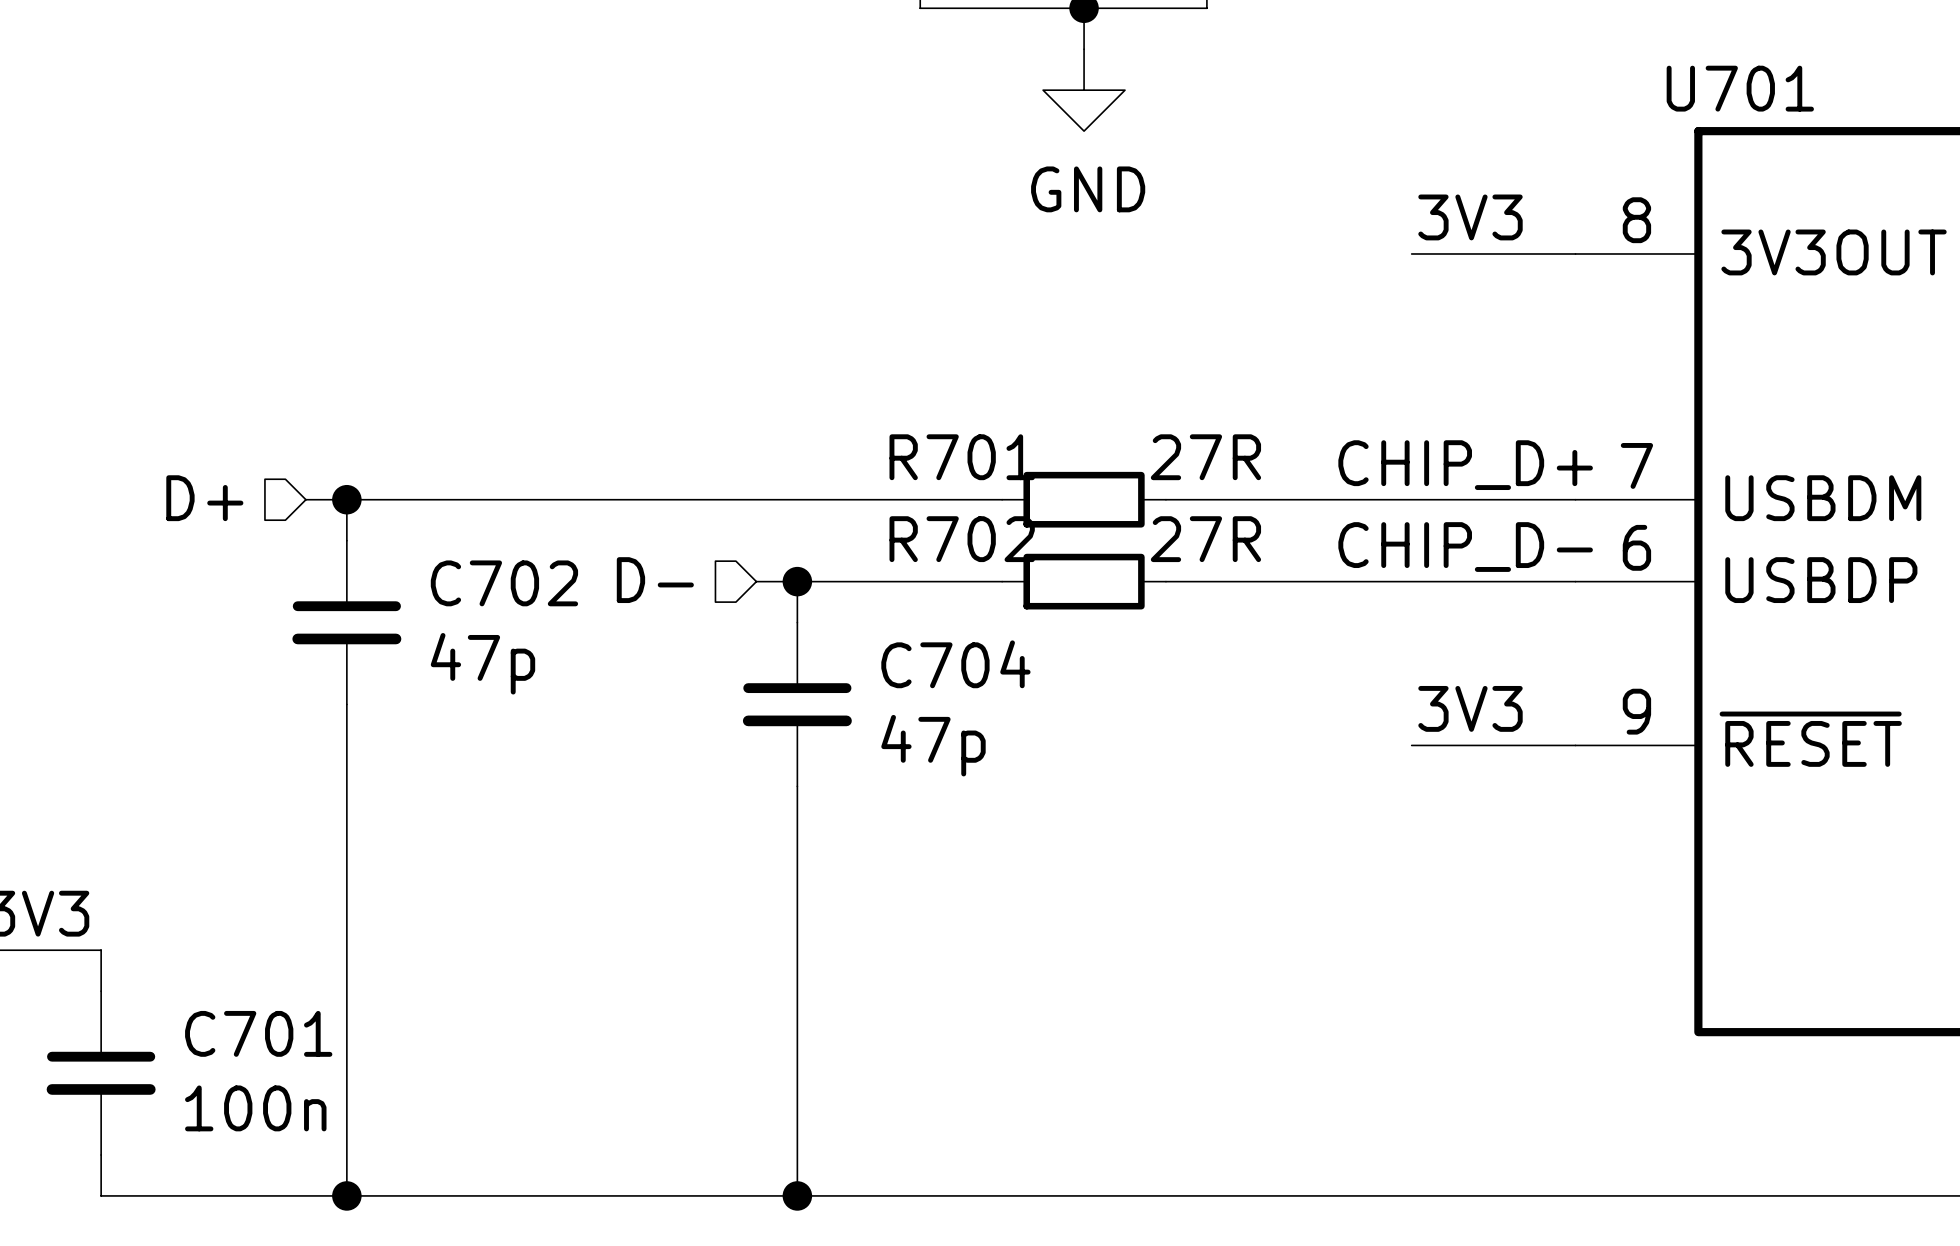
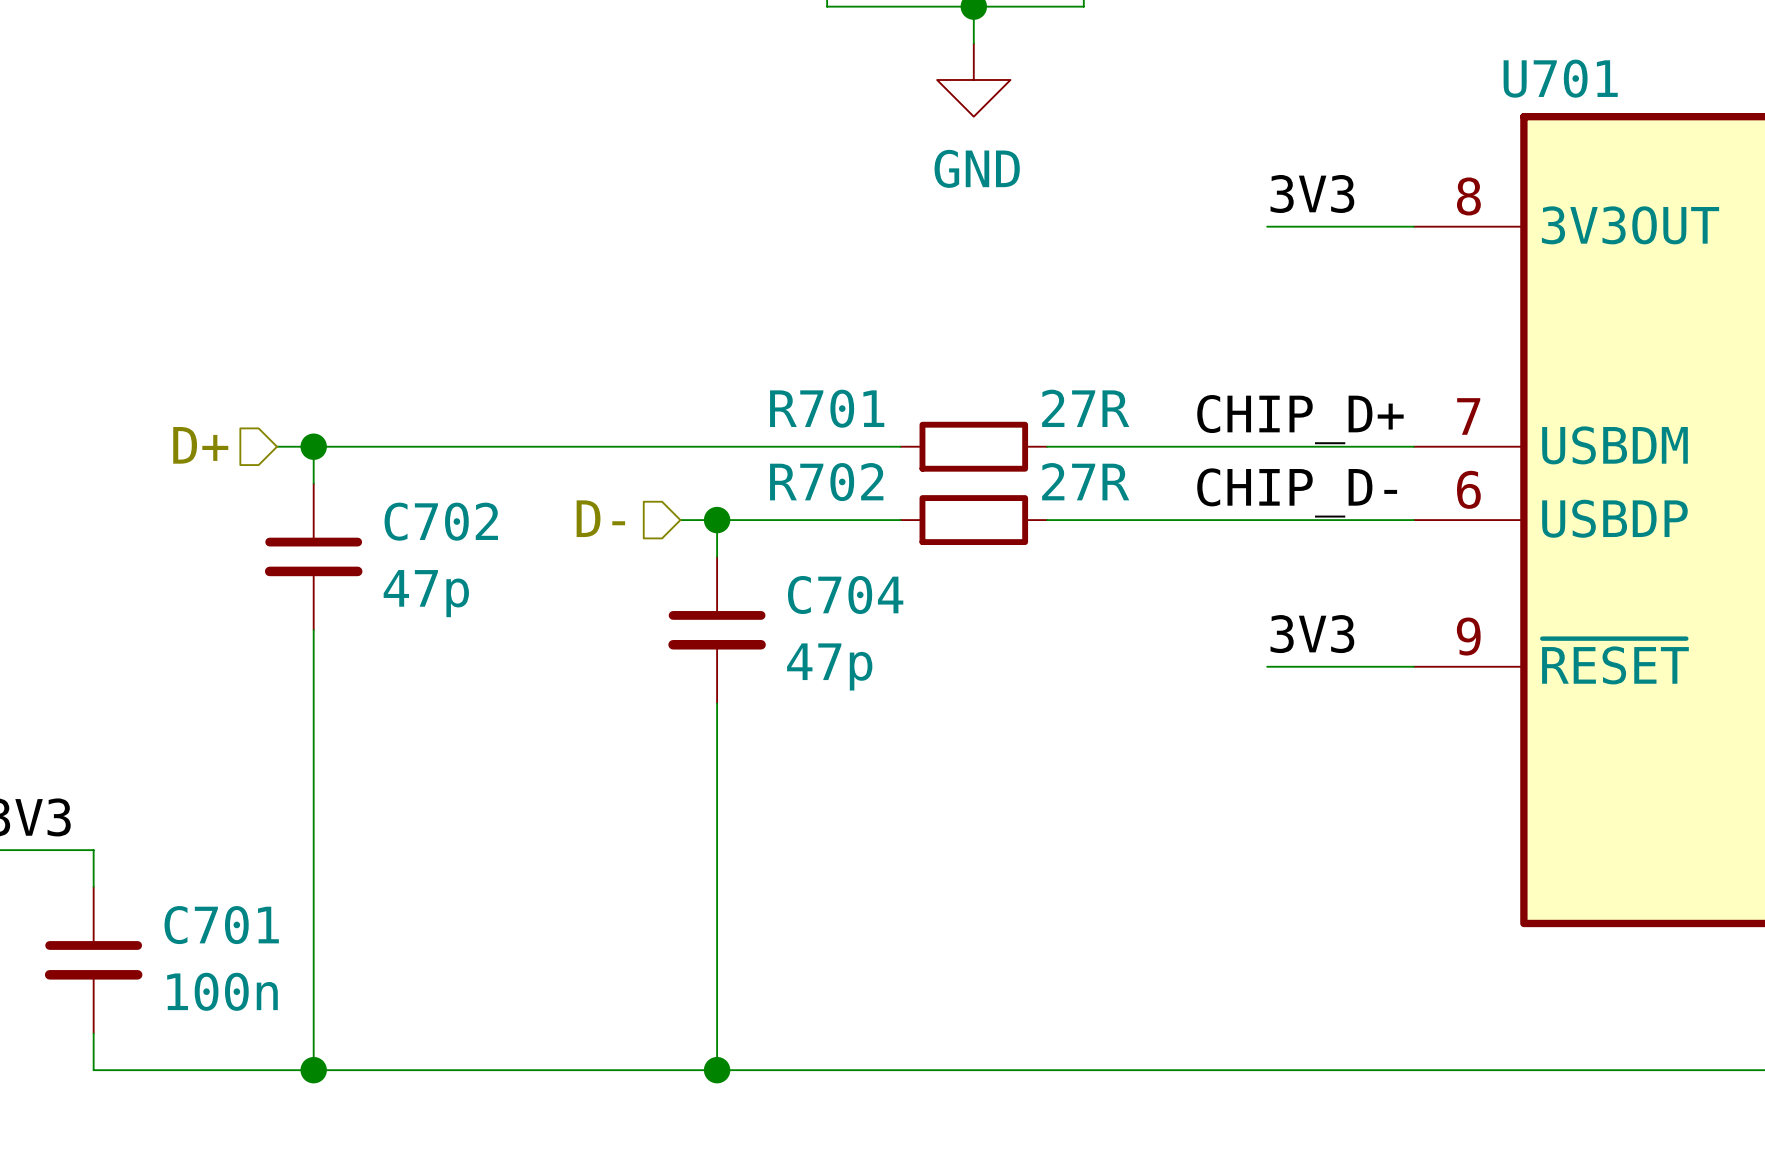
R701 name position: R701 (962, 457) -> R701 (827, 408)
R702 name position: R702 (962, 539) -> R702 (826, 482)

